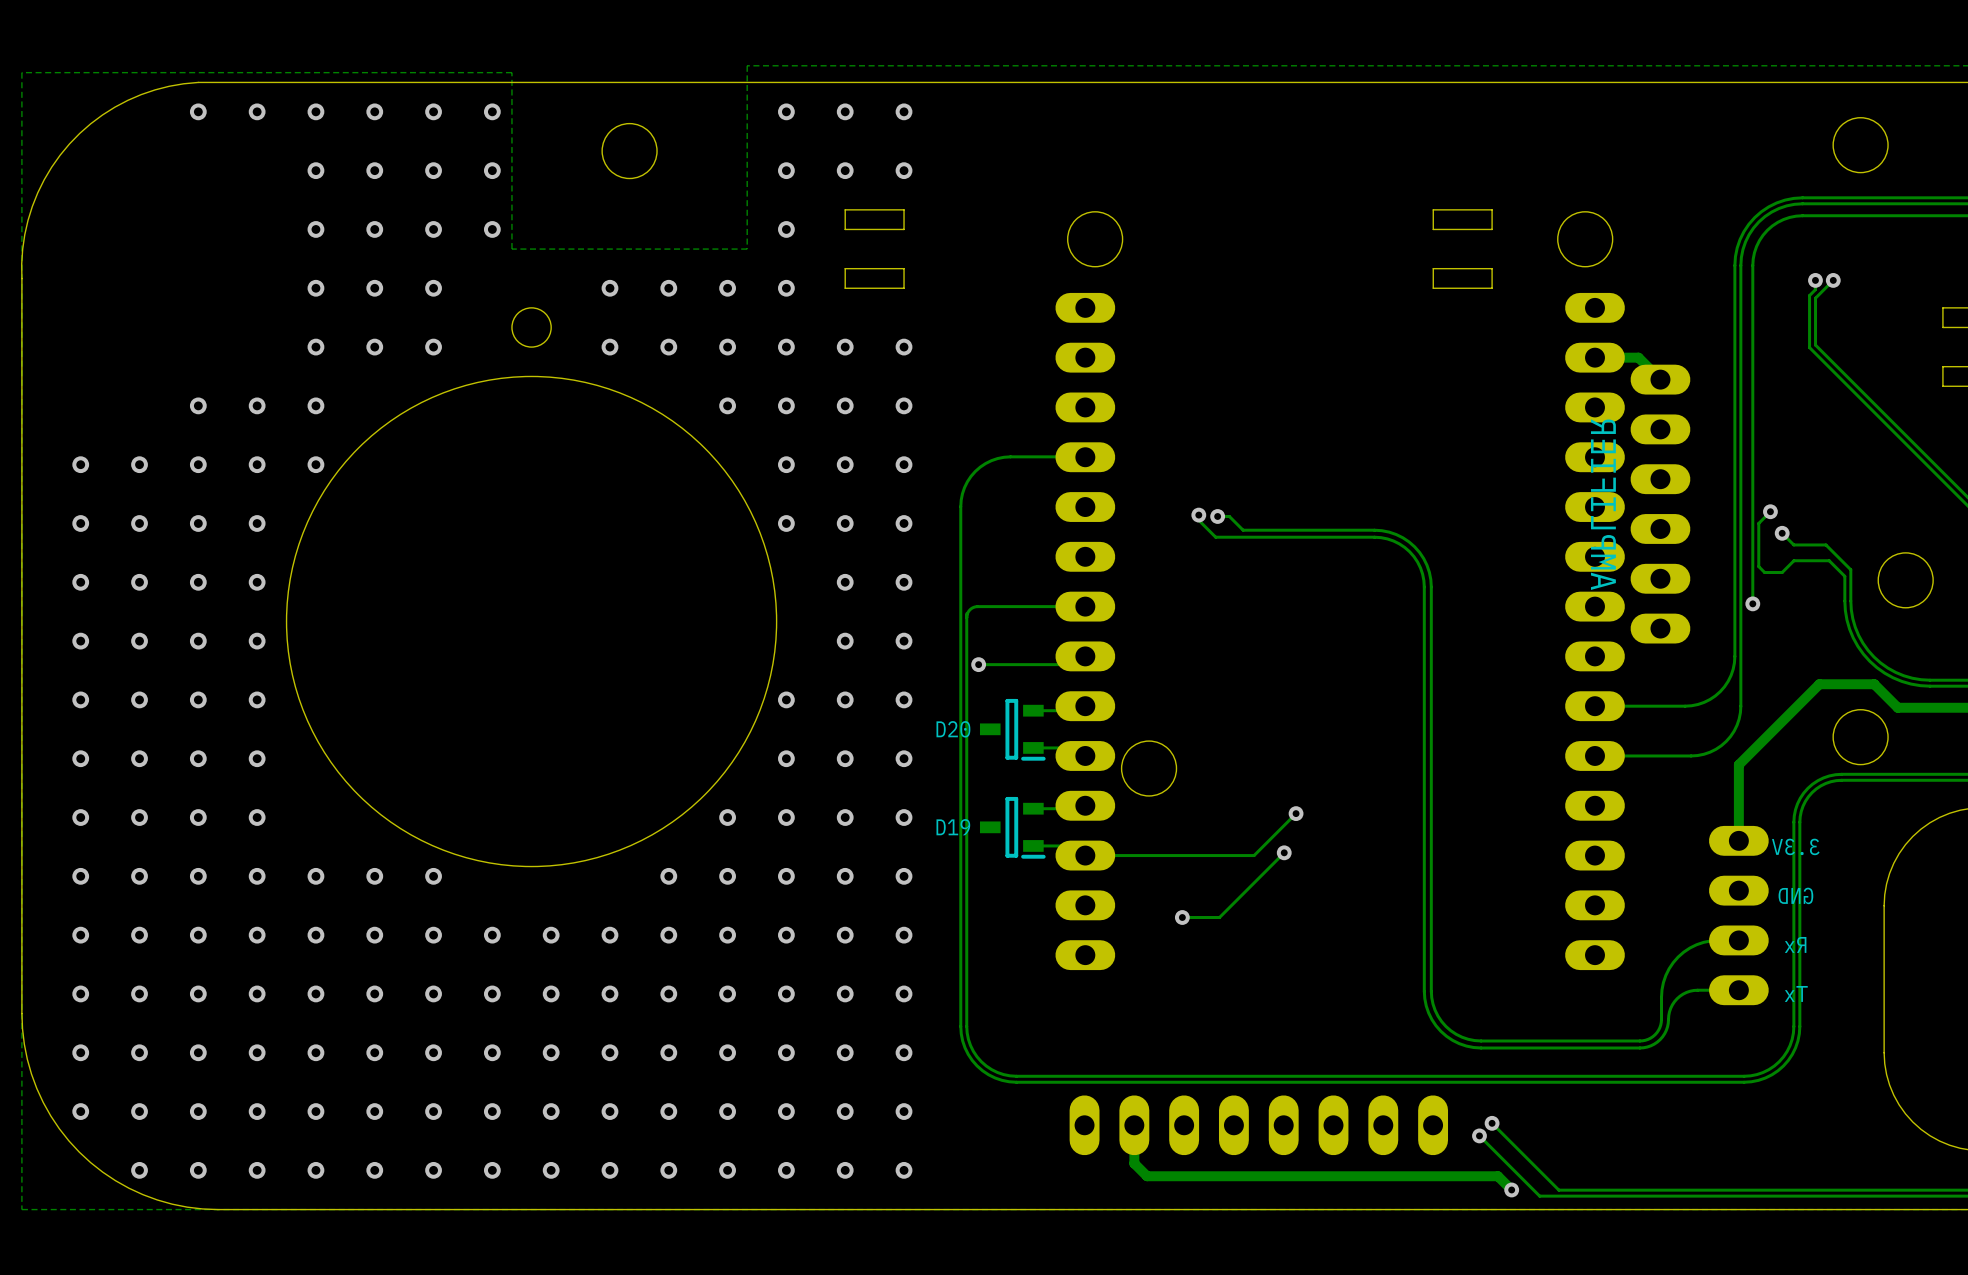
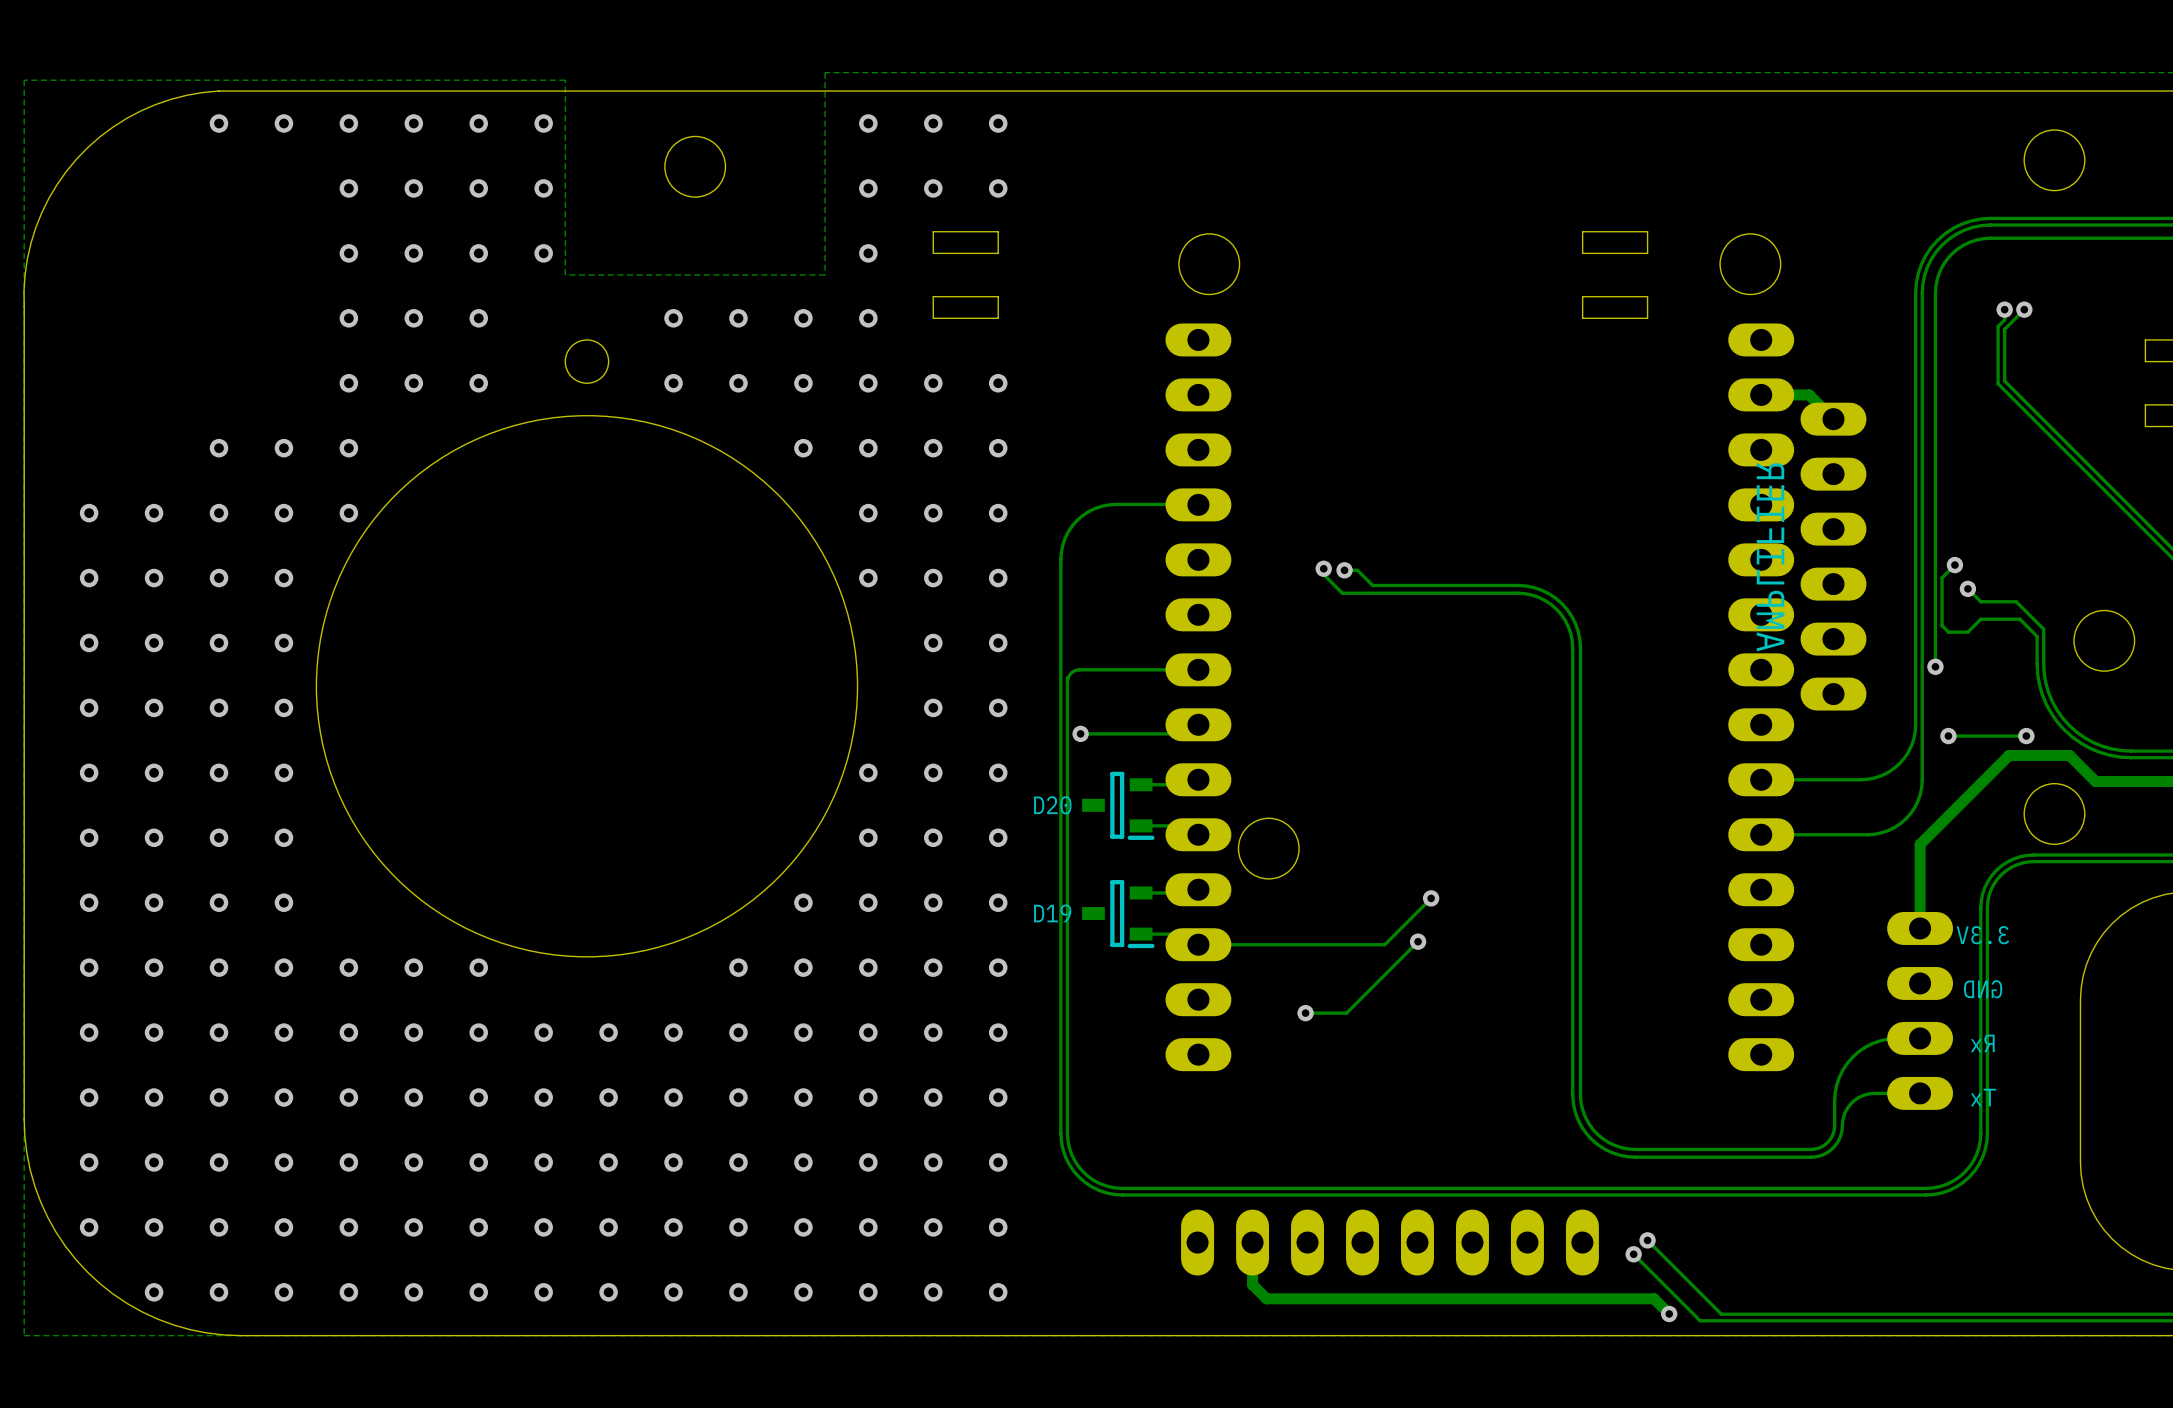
via: none -> (1948, 736)
track: none -> (2026, 736) (1948, 736)
via: none -> (2026, 736)

